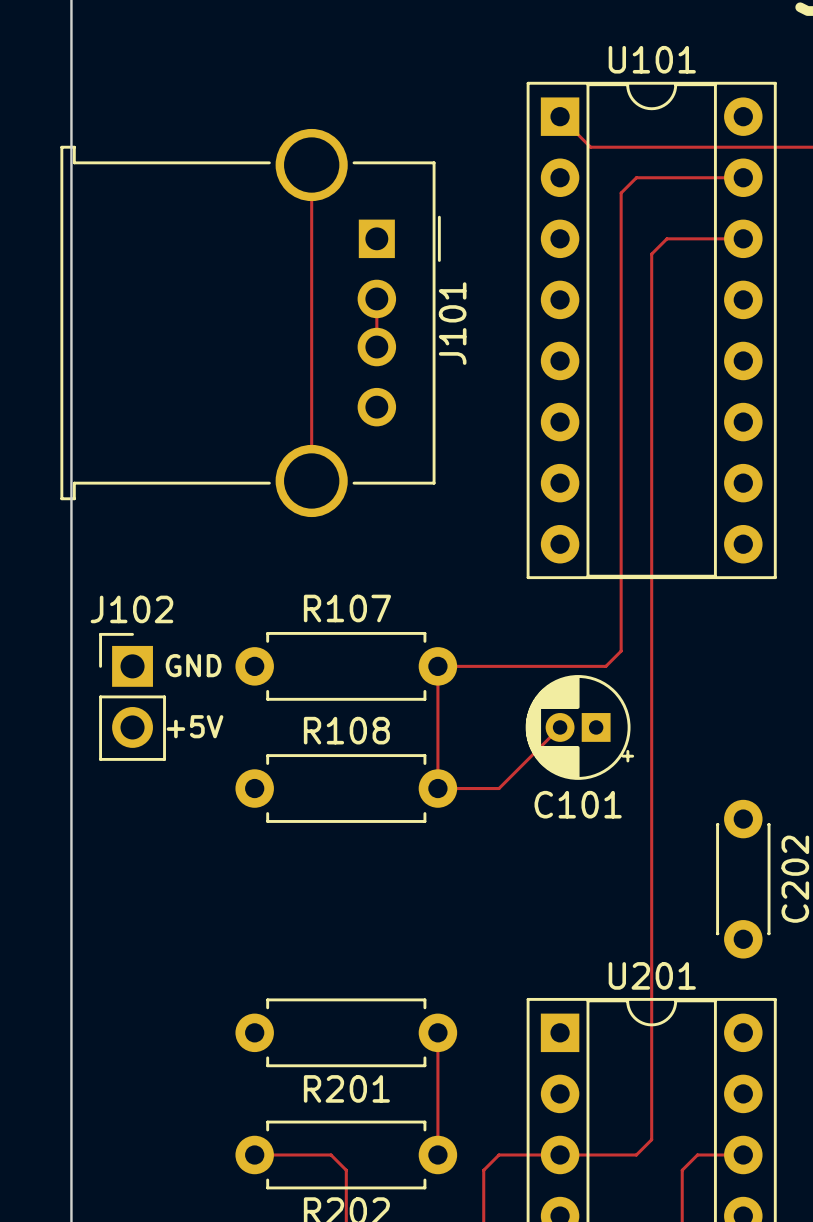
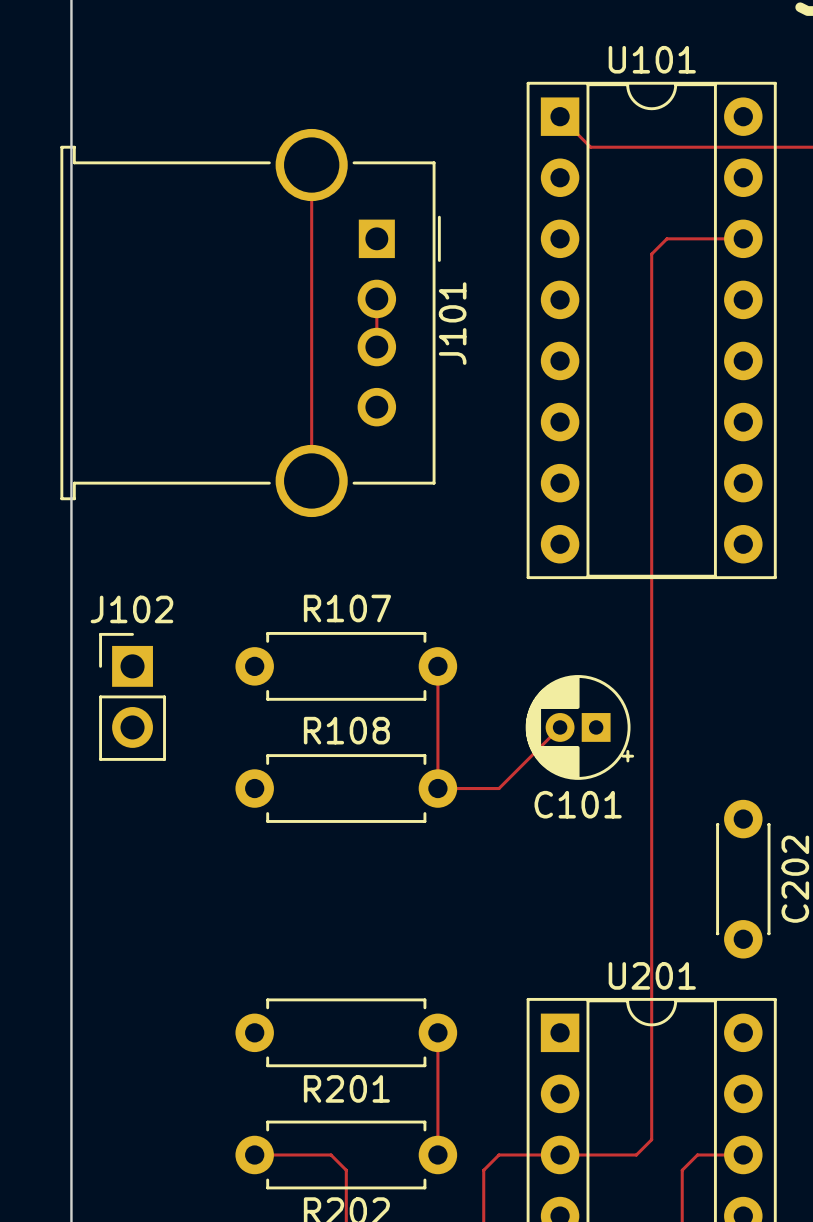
track: (743, 177) (636, 177) (621, 193) (621, 651) (605, 666) (437, 666) -> none
text: GND (193, 665) -> none
text: +5V (195, 726) -> none

